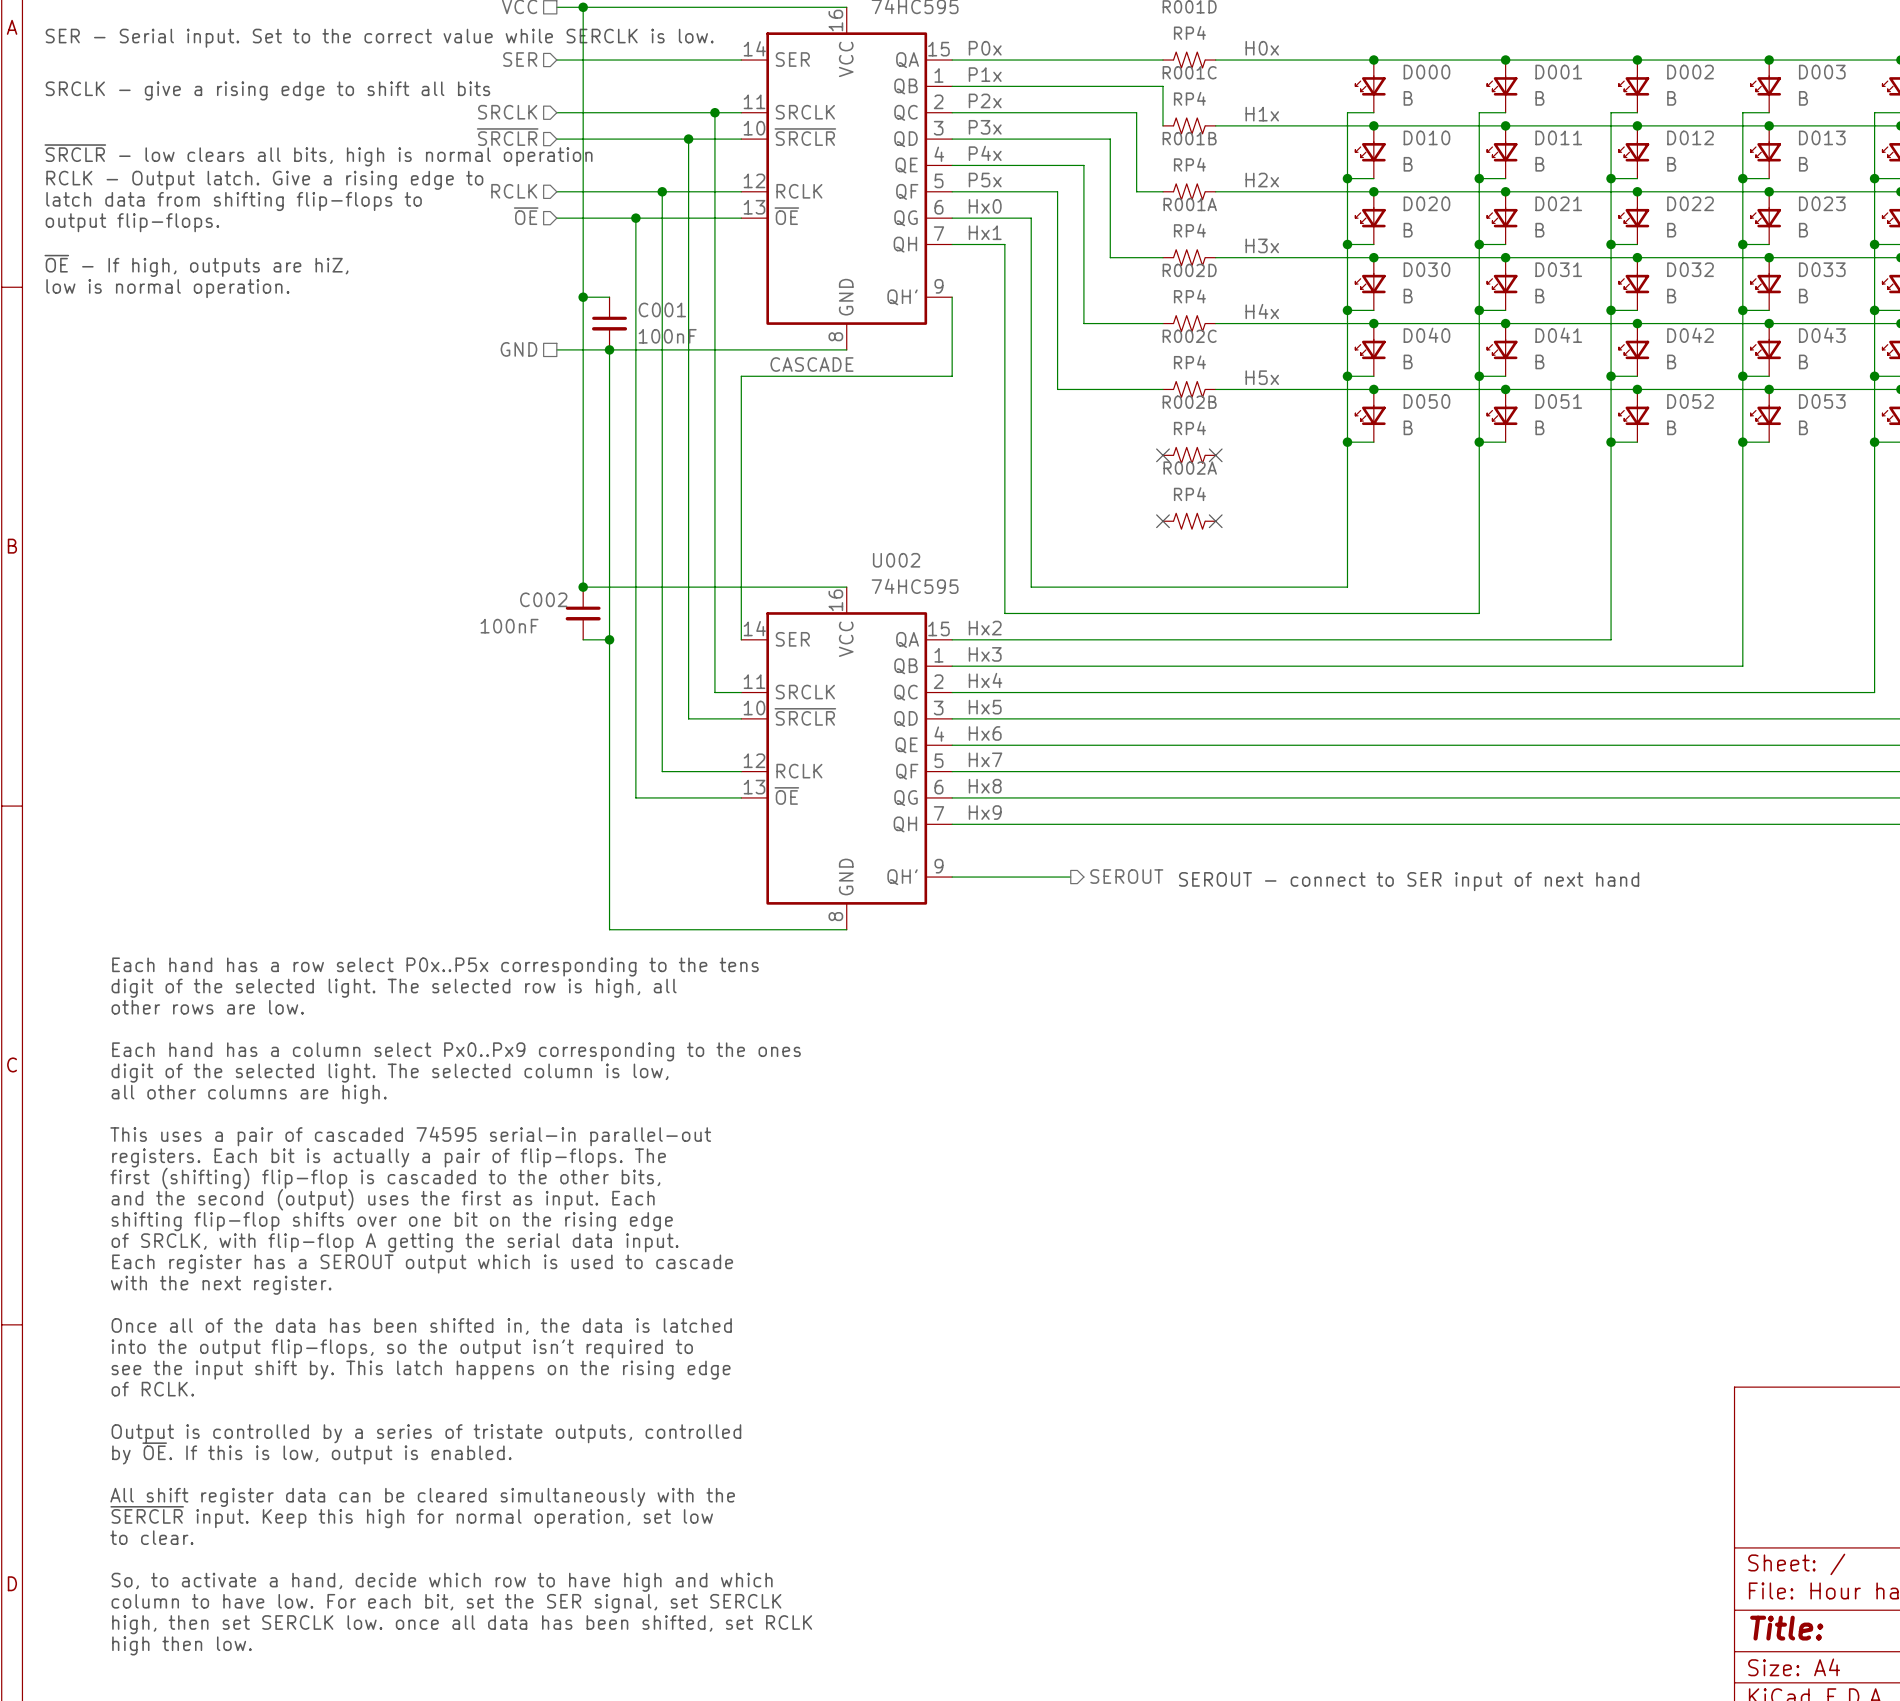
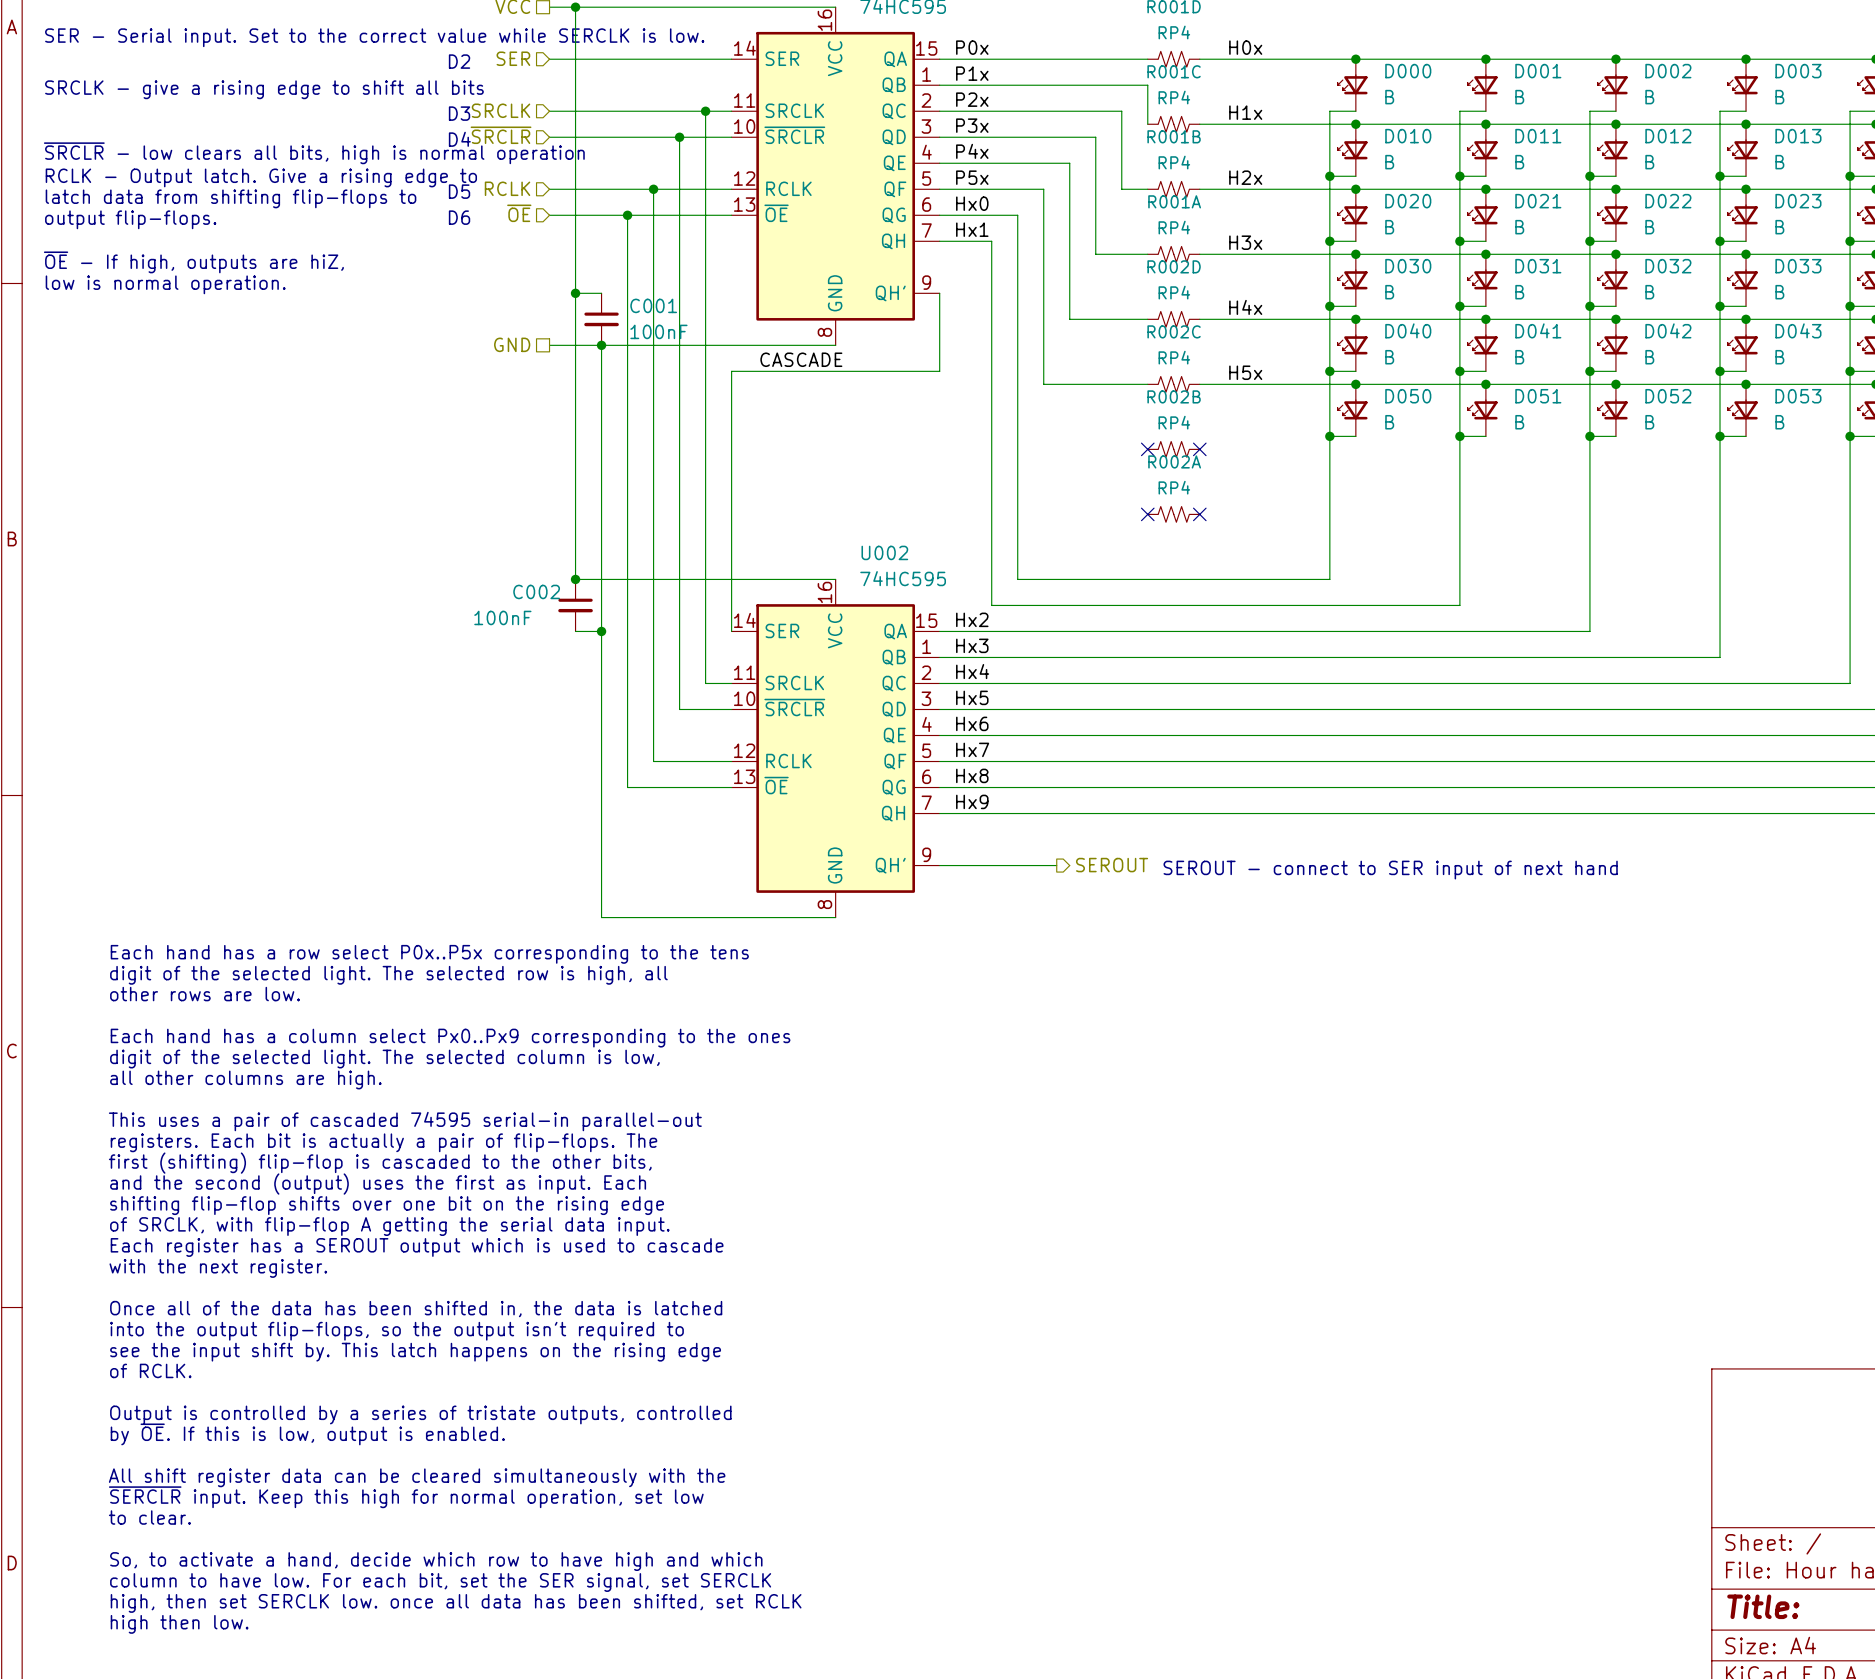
text: none -> D2 (459, 61)
text: none -> D3 (459, 113)
text: none -> D4 (459, 139)
text: none -> D5 (459, 191)
text: none -> D6 (459, 217)

